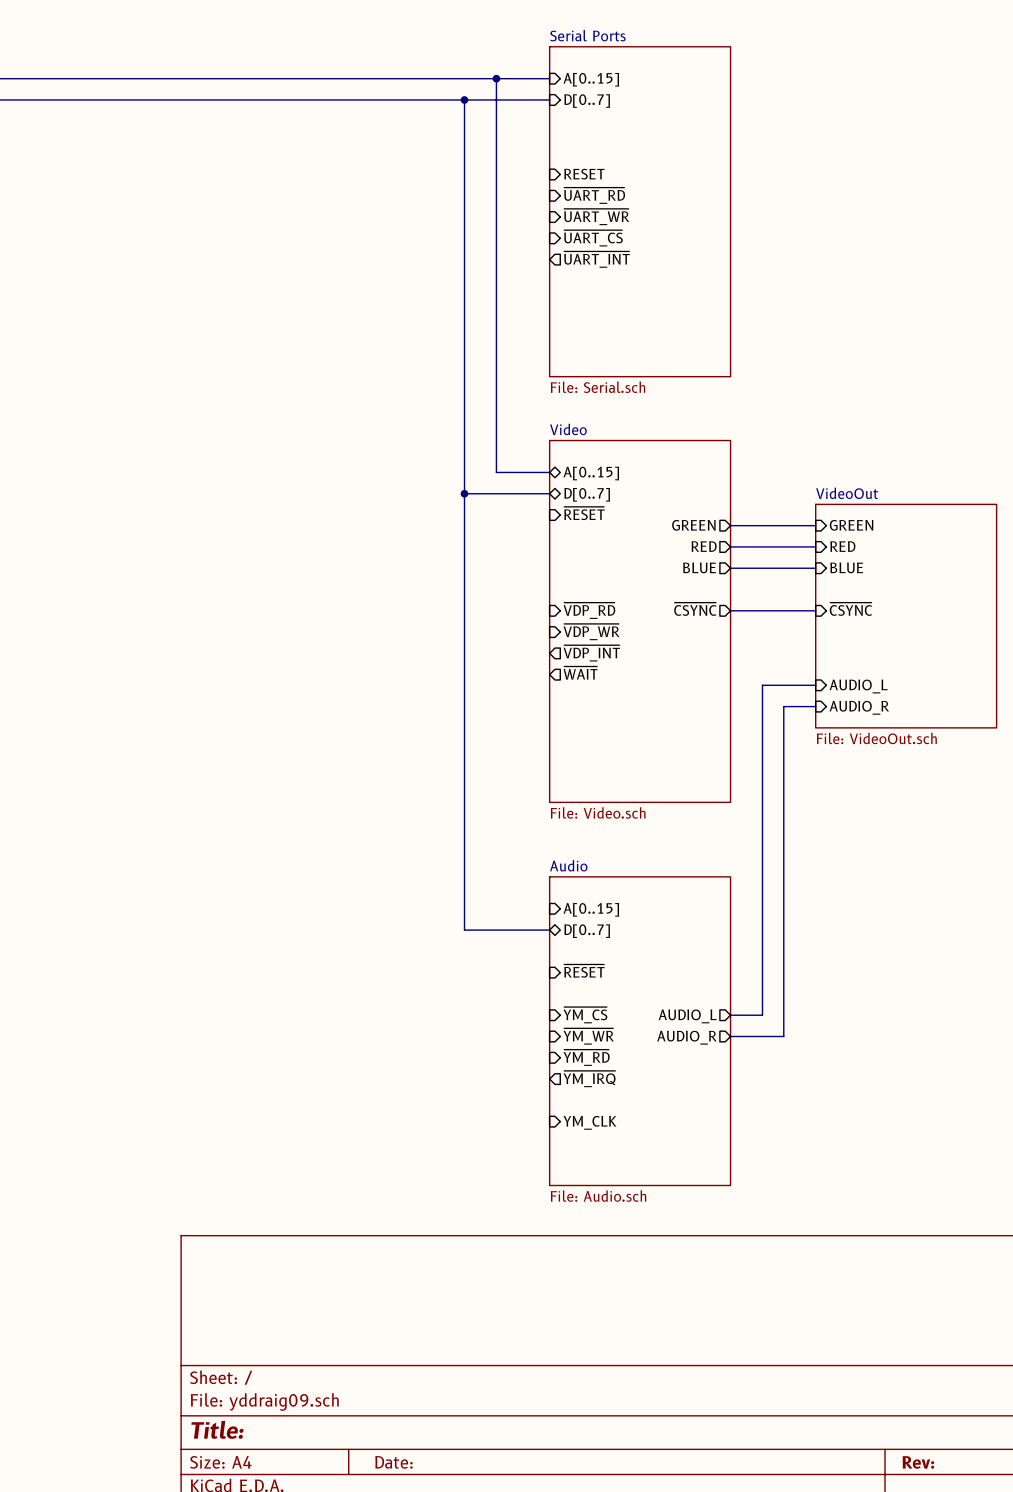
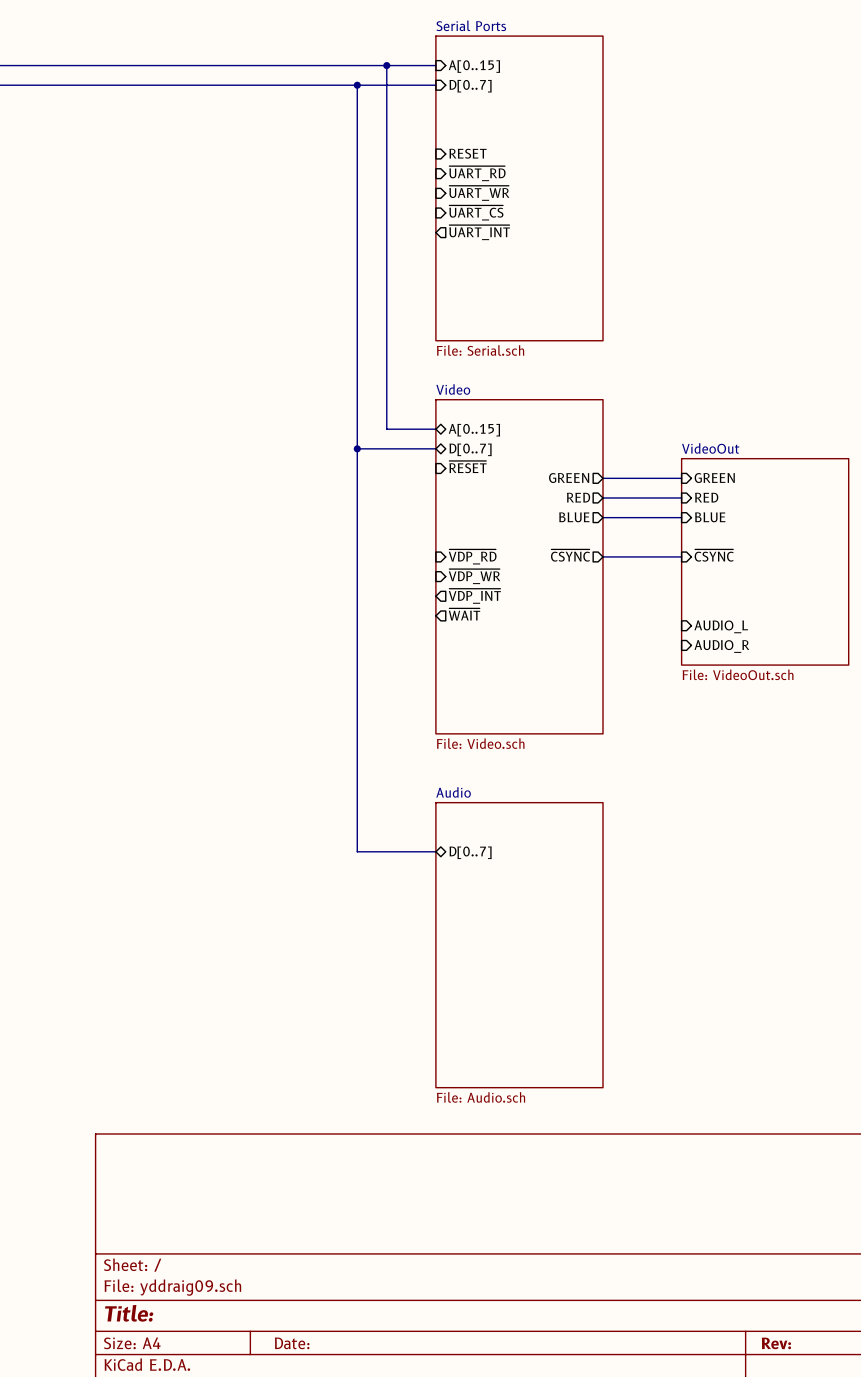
wire: (815, 685) (762, 685) (762, 1015) (730, 1015) -> none
wire: (815, 706) (783, 706) (783, 1036) (730, 1036) -> none
sheet pin: A[0..15] (591, 909) -> none
sheet pin: ~{RESET} (584, 971) -> none
sheet pin: ~{YM_CS} (585, 1015) -> none
sheet pin: AUDIO_L (687, 1016) -> none
sheet pin: ~{YM_WR} (588, 1036) -> none
sheet pin: AUDIO_R (686, 1037) -> none
sheet pin: ~{YM_RD} (586, 1057) -> none
sheet pin: ~{YM_IRQ} (589, 1079) -> none
sheet pin: YM_CLK (589, 1122) -> none

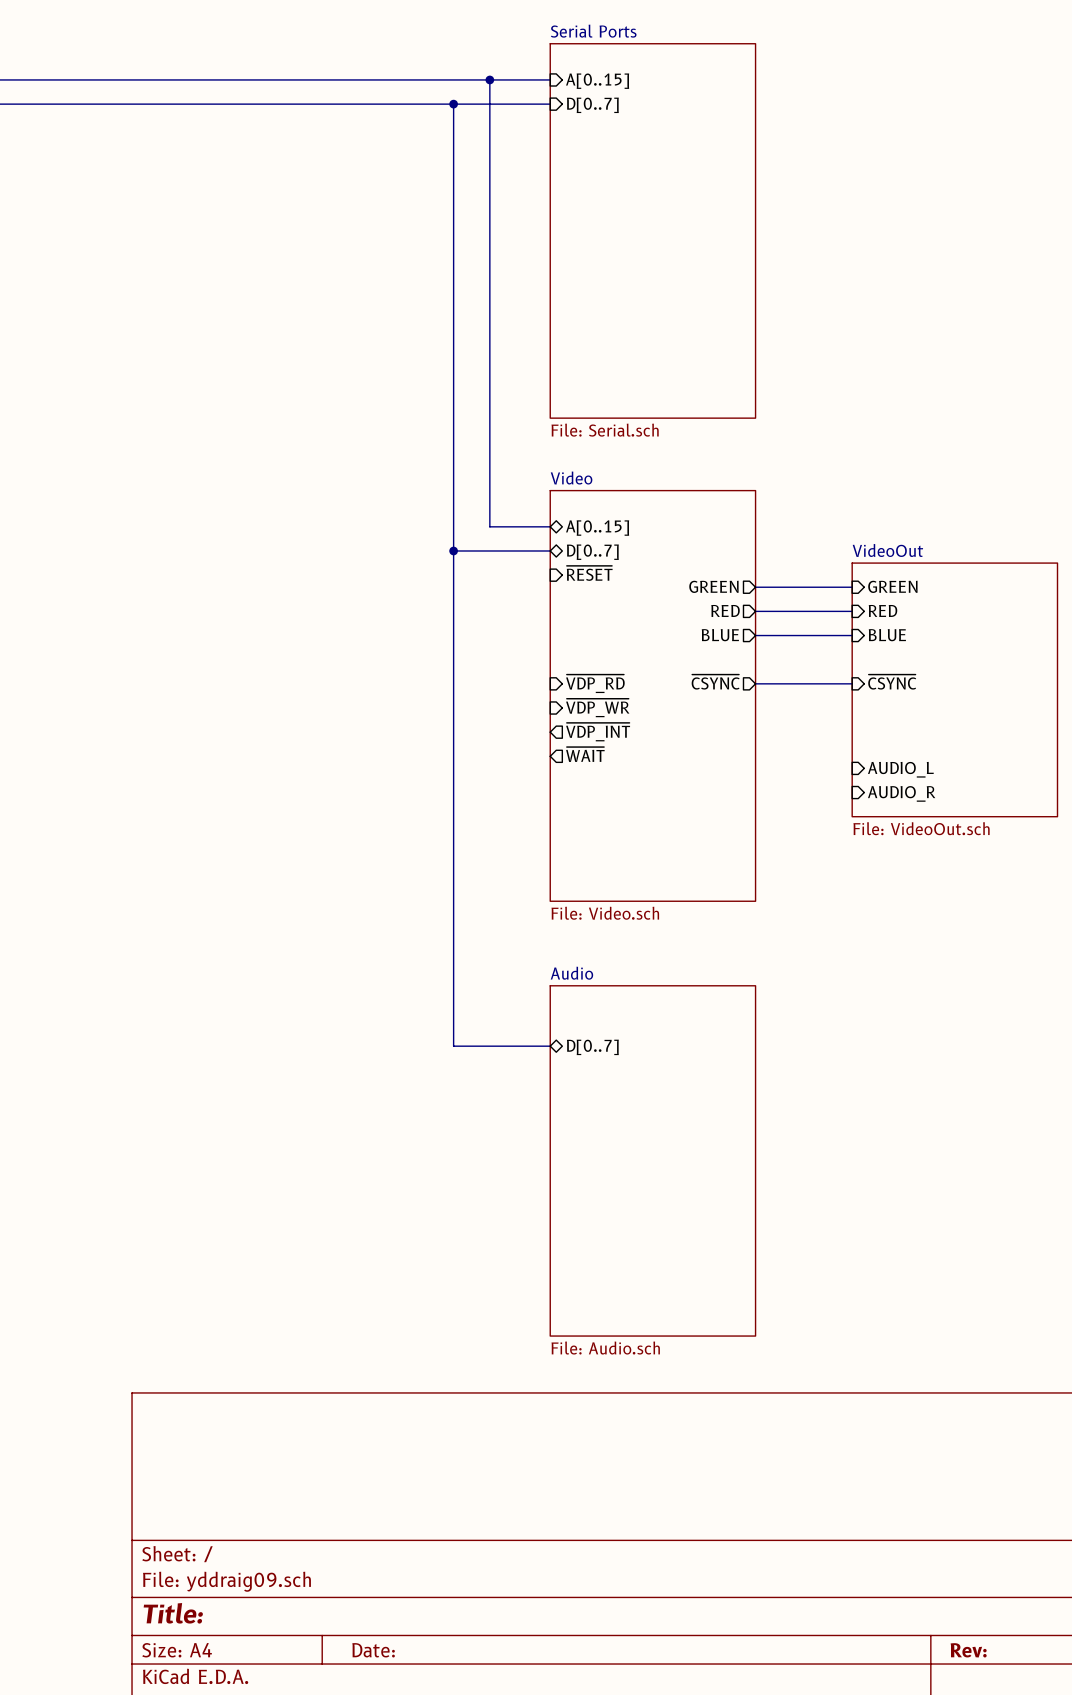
sheet pin: RESET (468, 153) -> none
sheet pin: ~{UART_RD} (477, 173) -> none
sheet pin: ~{UART_WR} (479, 193) -> none
sheet pin: ~{UART_CS} (476, 212) -> none
sheet pin: ~{UART_INT} (479, 232) -> none

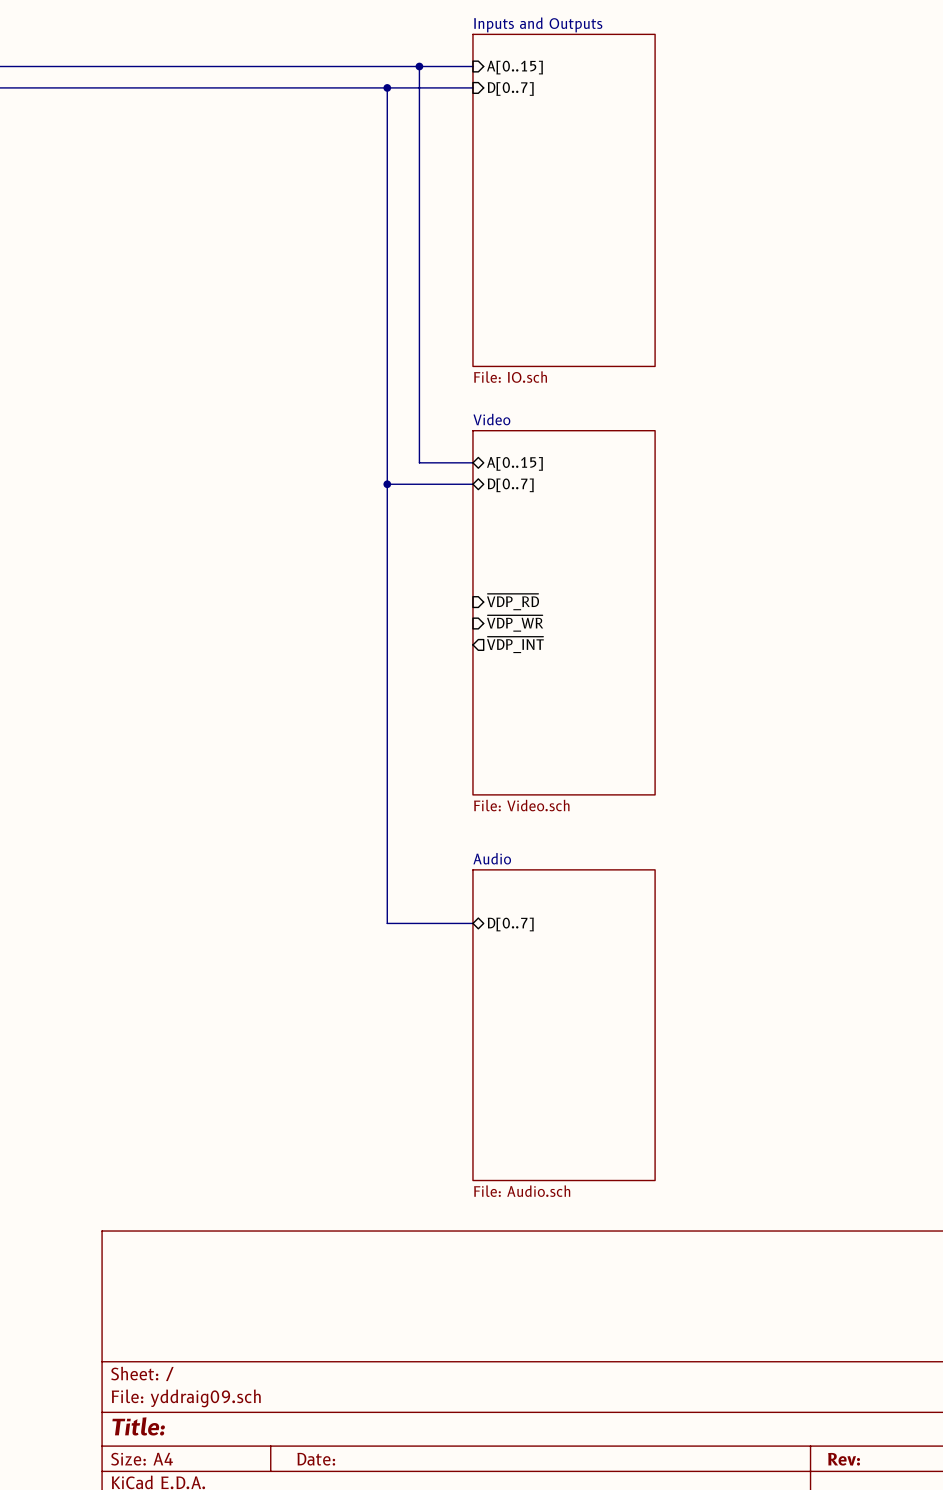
sheet Serial Ports name: Serial Ports (593, 31) -> Inputs and Outputs (538, 24)
sheet Serial Ports value: File: Serial.sch (605, 430) -> File: IO.sch (510, 377)
sheet pin: ~{RESET} (589, 573) -> none
sheet pin: GREEN (713, 586) -> none
sheet pin: GREEN (892, 586) -> none
wire: (755, 587) (852, 587) -> none
sheet pin: RED (725, 610) -> none
sheet pin: RED (882, 610) -> none
wire: (755, 611) (852, 611) -> none
sheet pin: BLUE (720, 635) -> none
wire: (755, 635) (852, 635) -> none
sheet pin: BLUE (887, 635) -> none
sheet pin: ~{CSYNC} (715, 682) -> none
sheet pin: ~{CSYNC} (892, 682) -> none
wire: (755, 683) (852, 683) -> none
sheet VideoOut: File: VideoOut.sch (954, 689) -> none
sheet pin: ~{WAIT} (585, 754) -> none
sheet pin: AUDIO_L (900, 769) -> none
sheet pin: AUDIO_R (901, 793) -> none

